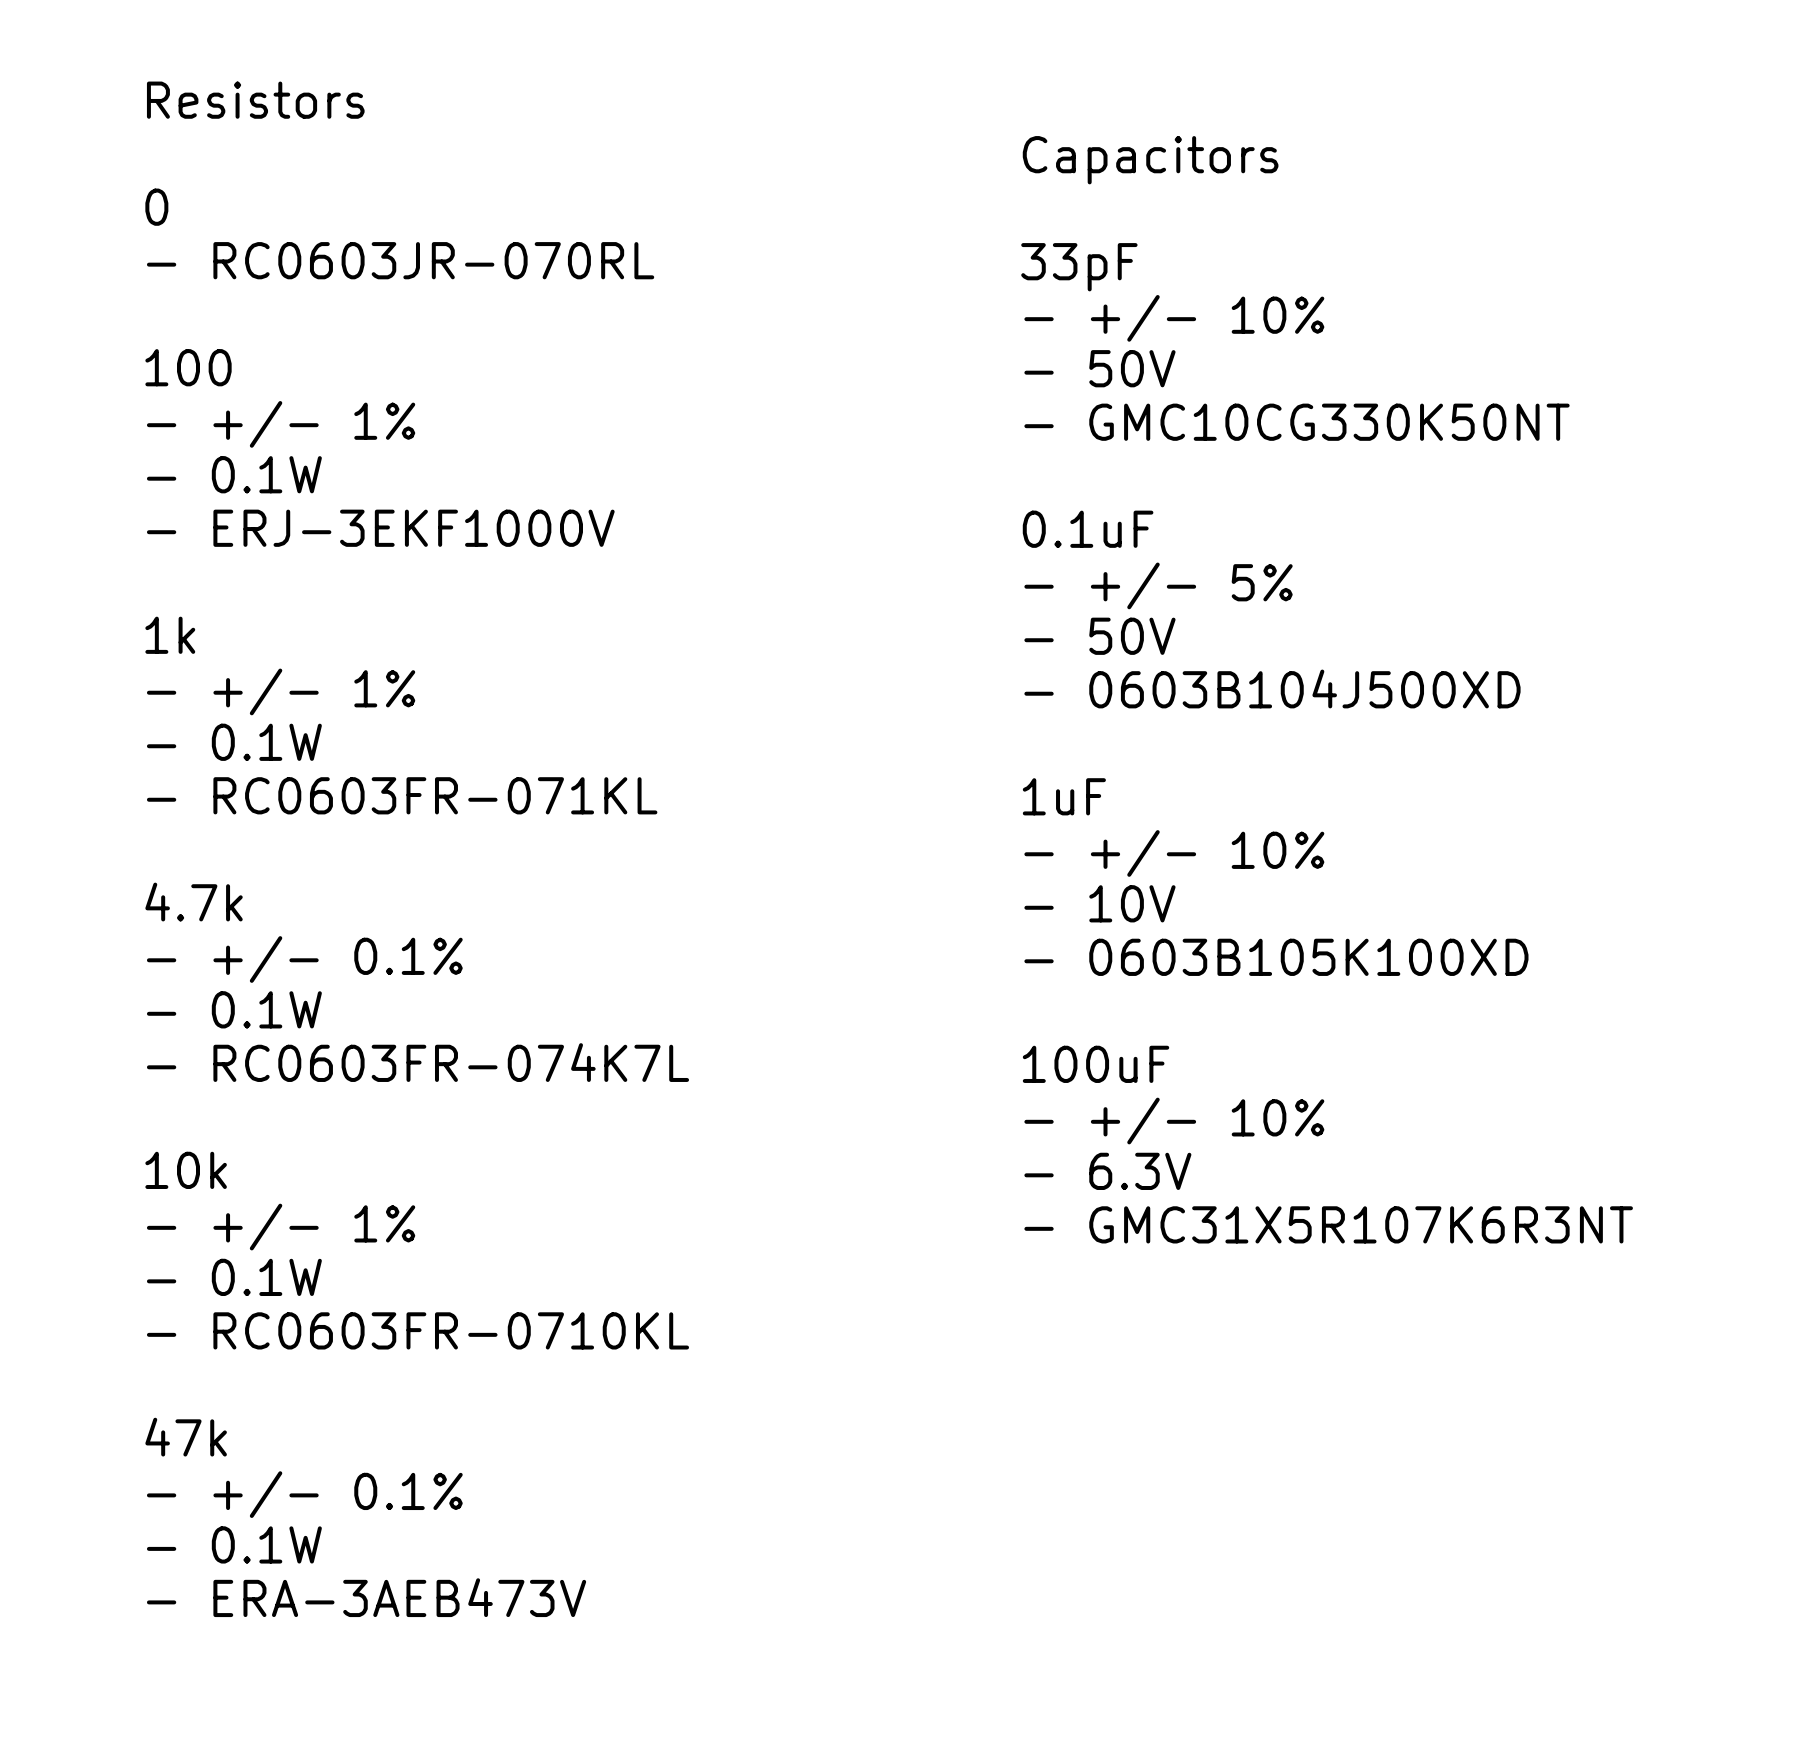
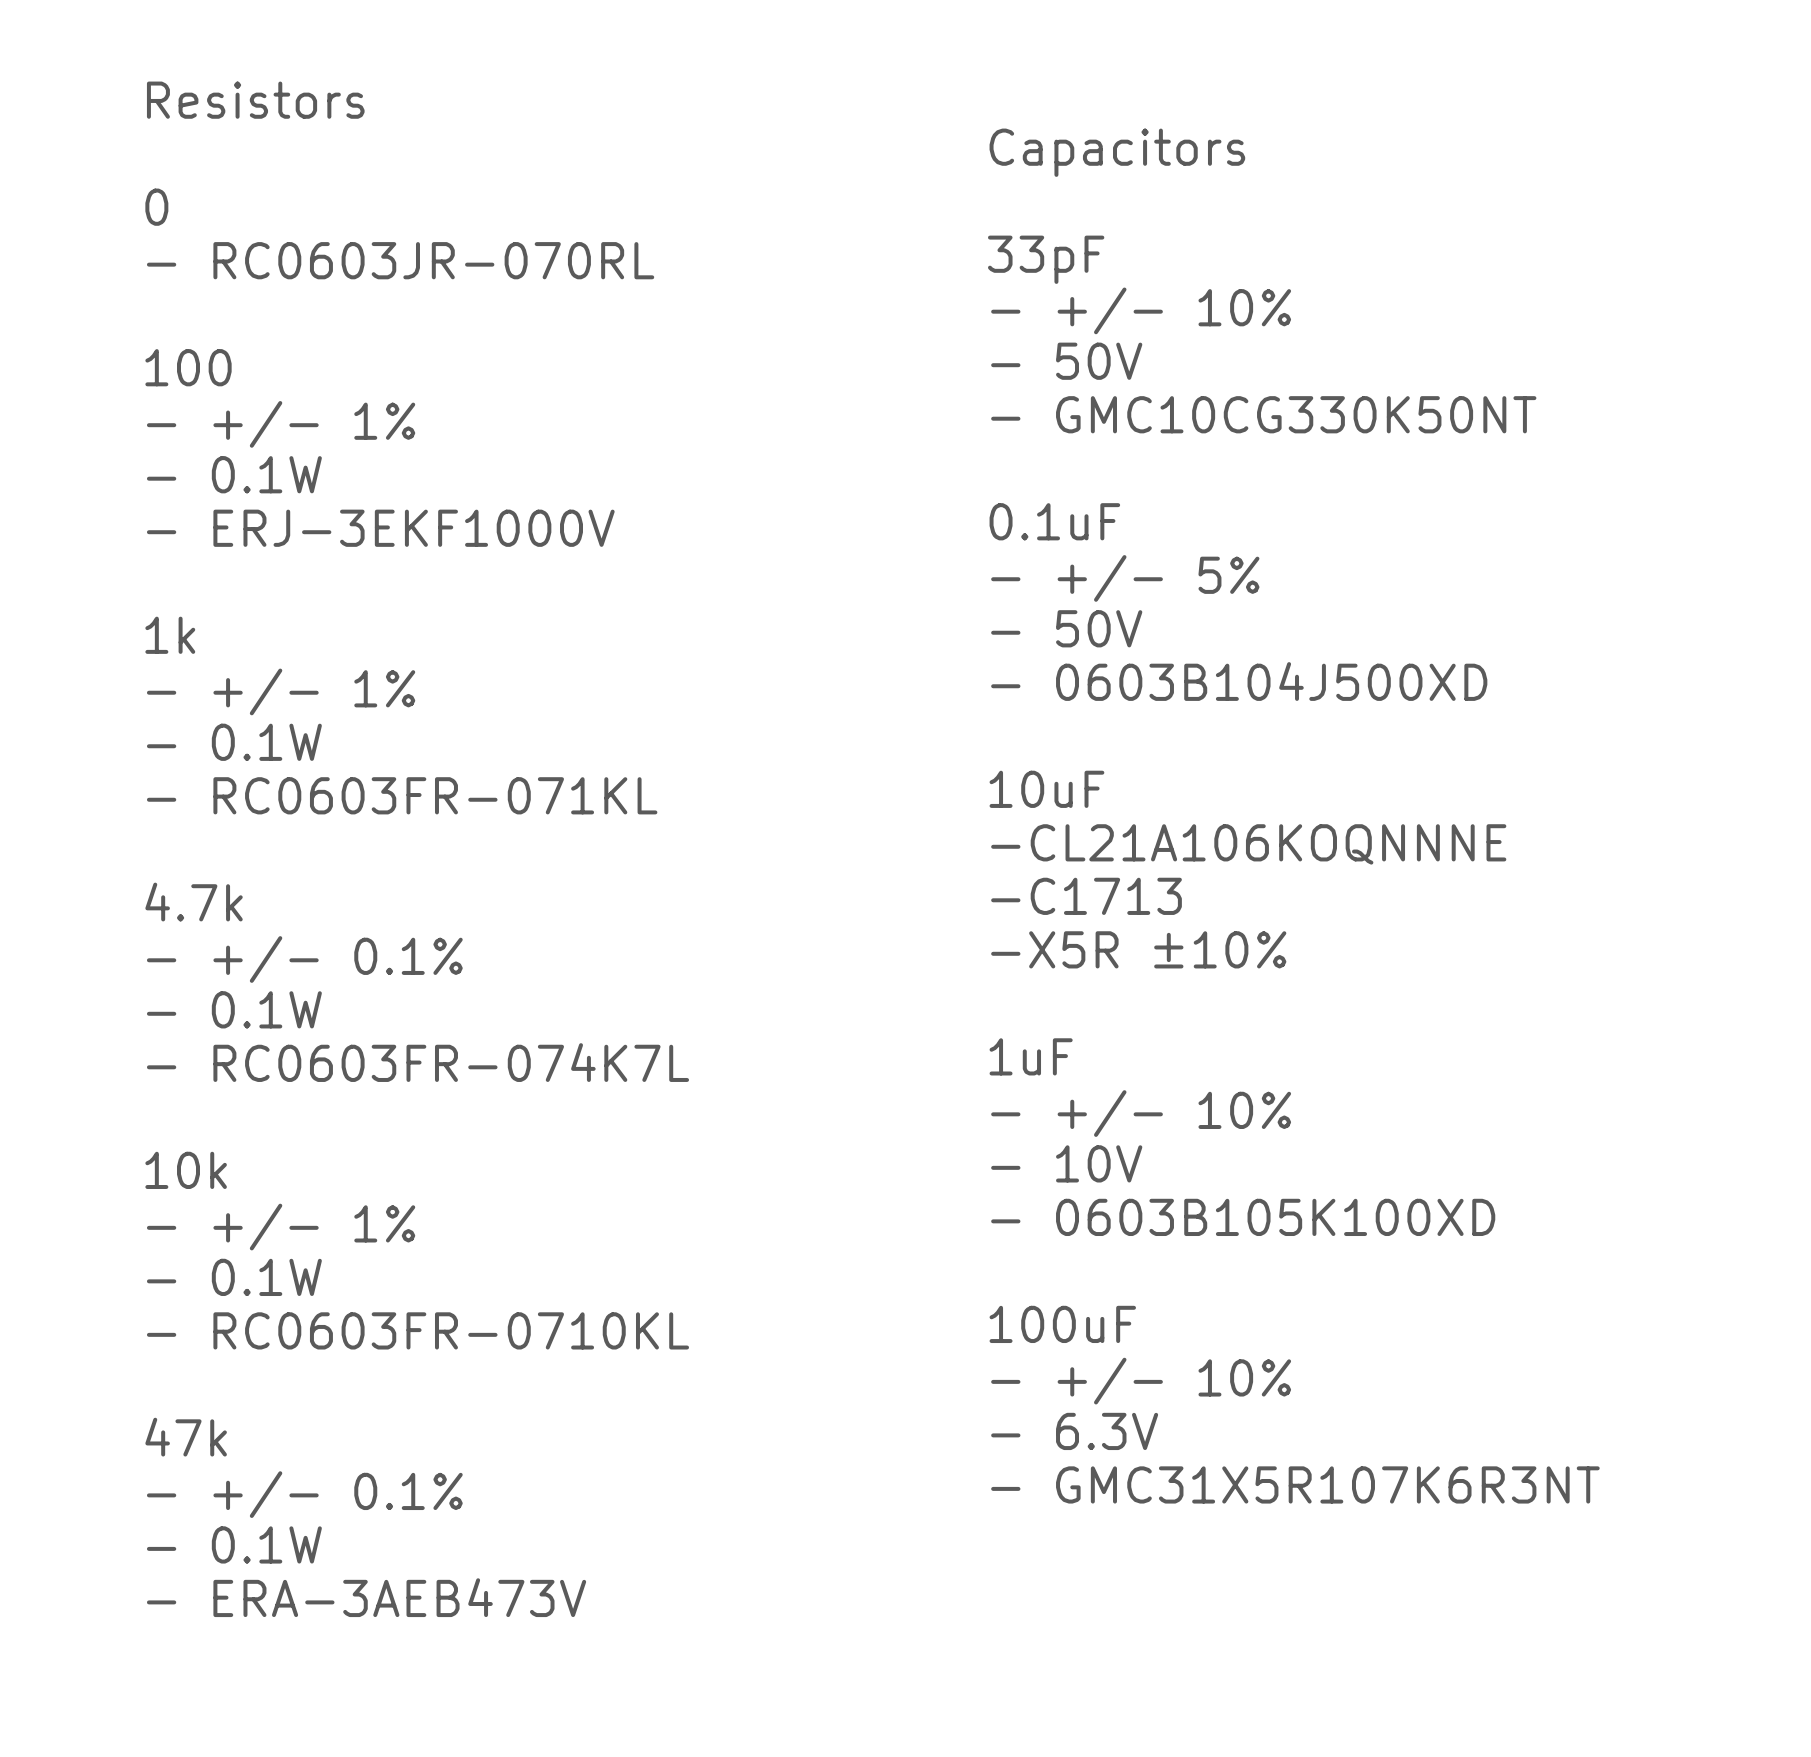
text position: Capacitors (1150, 160) -> Capacitors (1117, 152)
text position: 33pF (1079, 267) -> 33pF (1046, 259)
text position: - +/- 10% (1174, 318) -> - +/- 10% (1141, 310)
text position: - 50V (1099, 368) -> - 50V (1066, 361)
text position: - GMC10CG330K50NT (1297, 422) -> - GMC10CG330K50NT (1263, 414)
text position: 0.1uF (1088, 529) -> 0.1uF (1054, 521)
text position: - +/- 5% (1158, 585) -> - +/- 5% (1125, 578)
text position: - 50V (1099, 636) -> - 50V (1066, 628)
text position: - 0603B104J500XD (1272, 688) -> - 0603B104J500XD (1239, 681)
text: none -> 10uF (1046, 789)
text position: 1uF (1064, 796) -> 1uF (1031, 1056)
text: none -> -CL21A106KOQNNNE (1248, 844)
text: - +/- 10% (1174, 853) -> none
text: none -> -C1713 (1086, 896)
text position: - 10V (1099, 903) -> - 10V (1066, 1163)
text: none -> -X5R ±10% (1138, 949)
text position: - 0603B105K100XD (1276, 957) -> - 0603B105K100XD (1243, 1217)
text position: 100uF (1096, 1064) -> 100uF (1062, 1324)
text position: - +/- 10% (1174, 1121) -> - +/- 10% (1141, 1113)
text position: - 6.3V (1107, 1171) -> - 6.3V (1074, 1431)
text position: - GMC31X5R107K6R3NT (1328, 1224) -> - GMC31X5R107K6R3NT (1295, 1484)
text: none -> - +/- 10% (1141, 1381)

